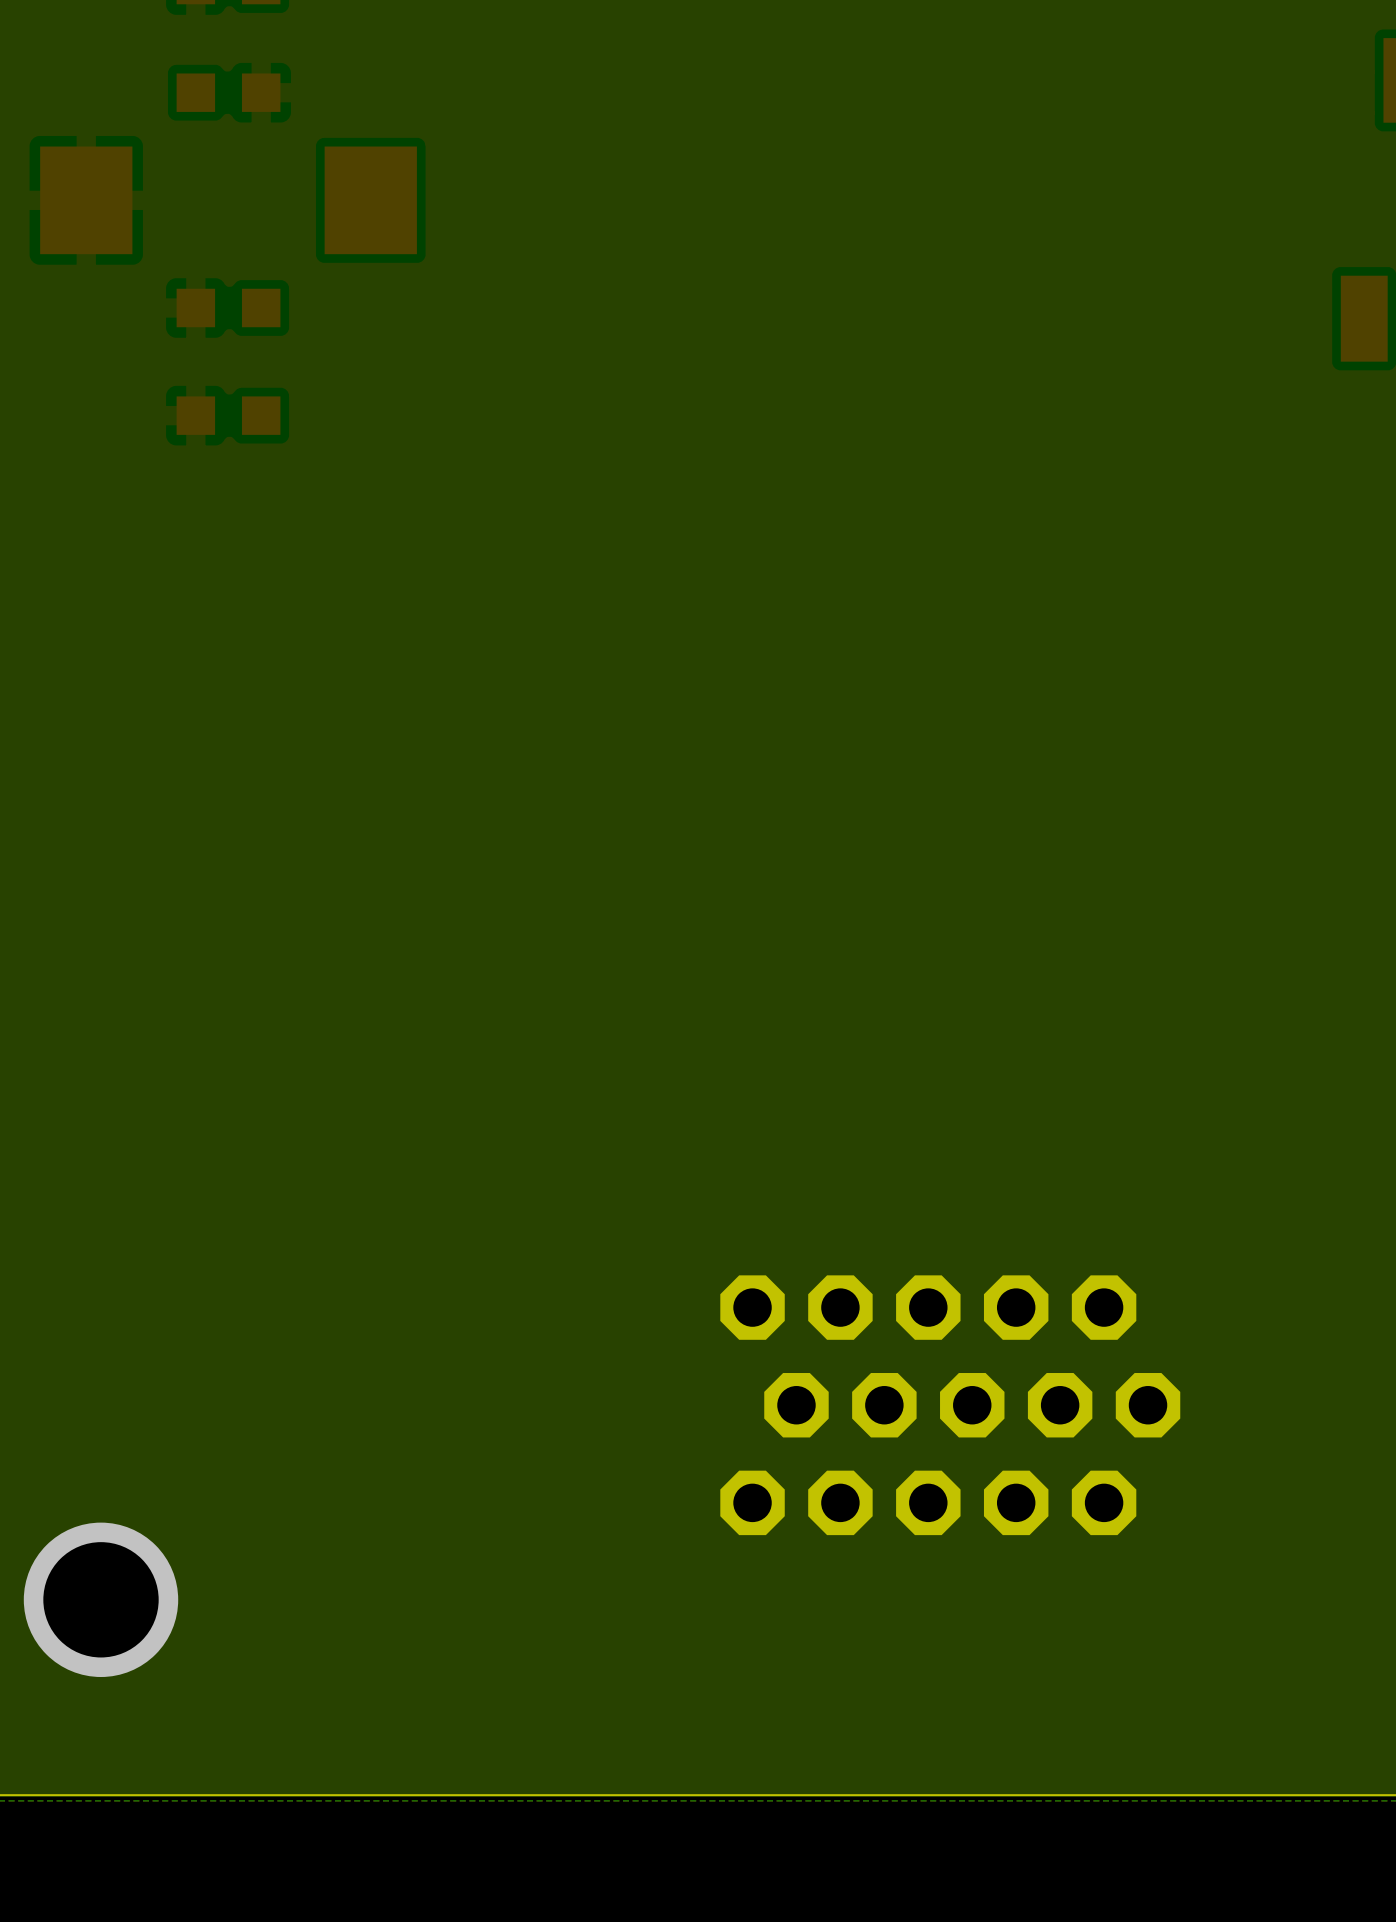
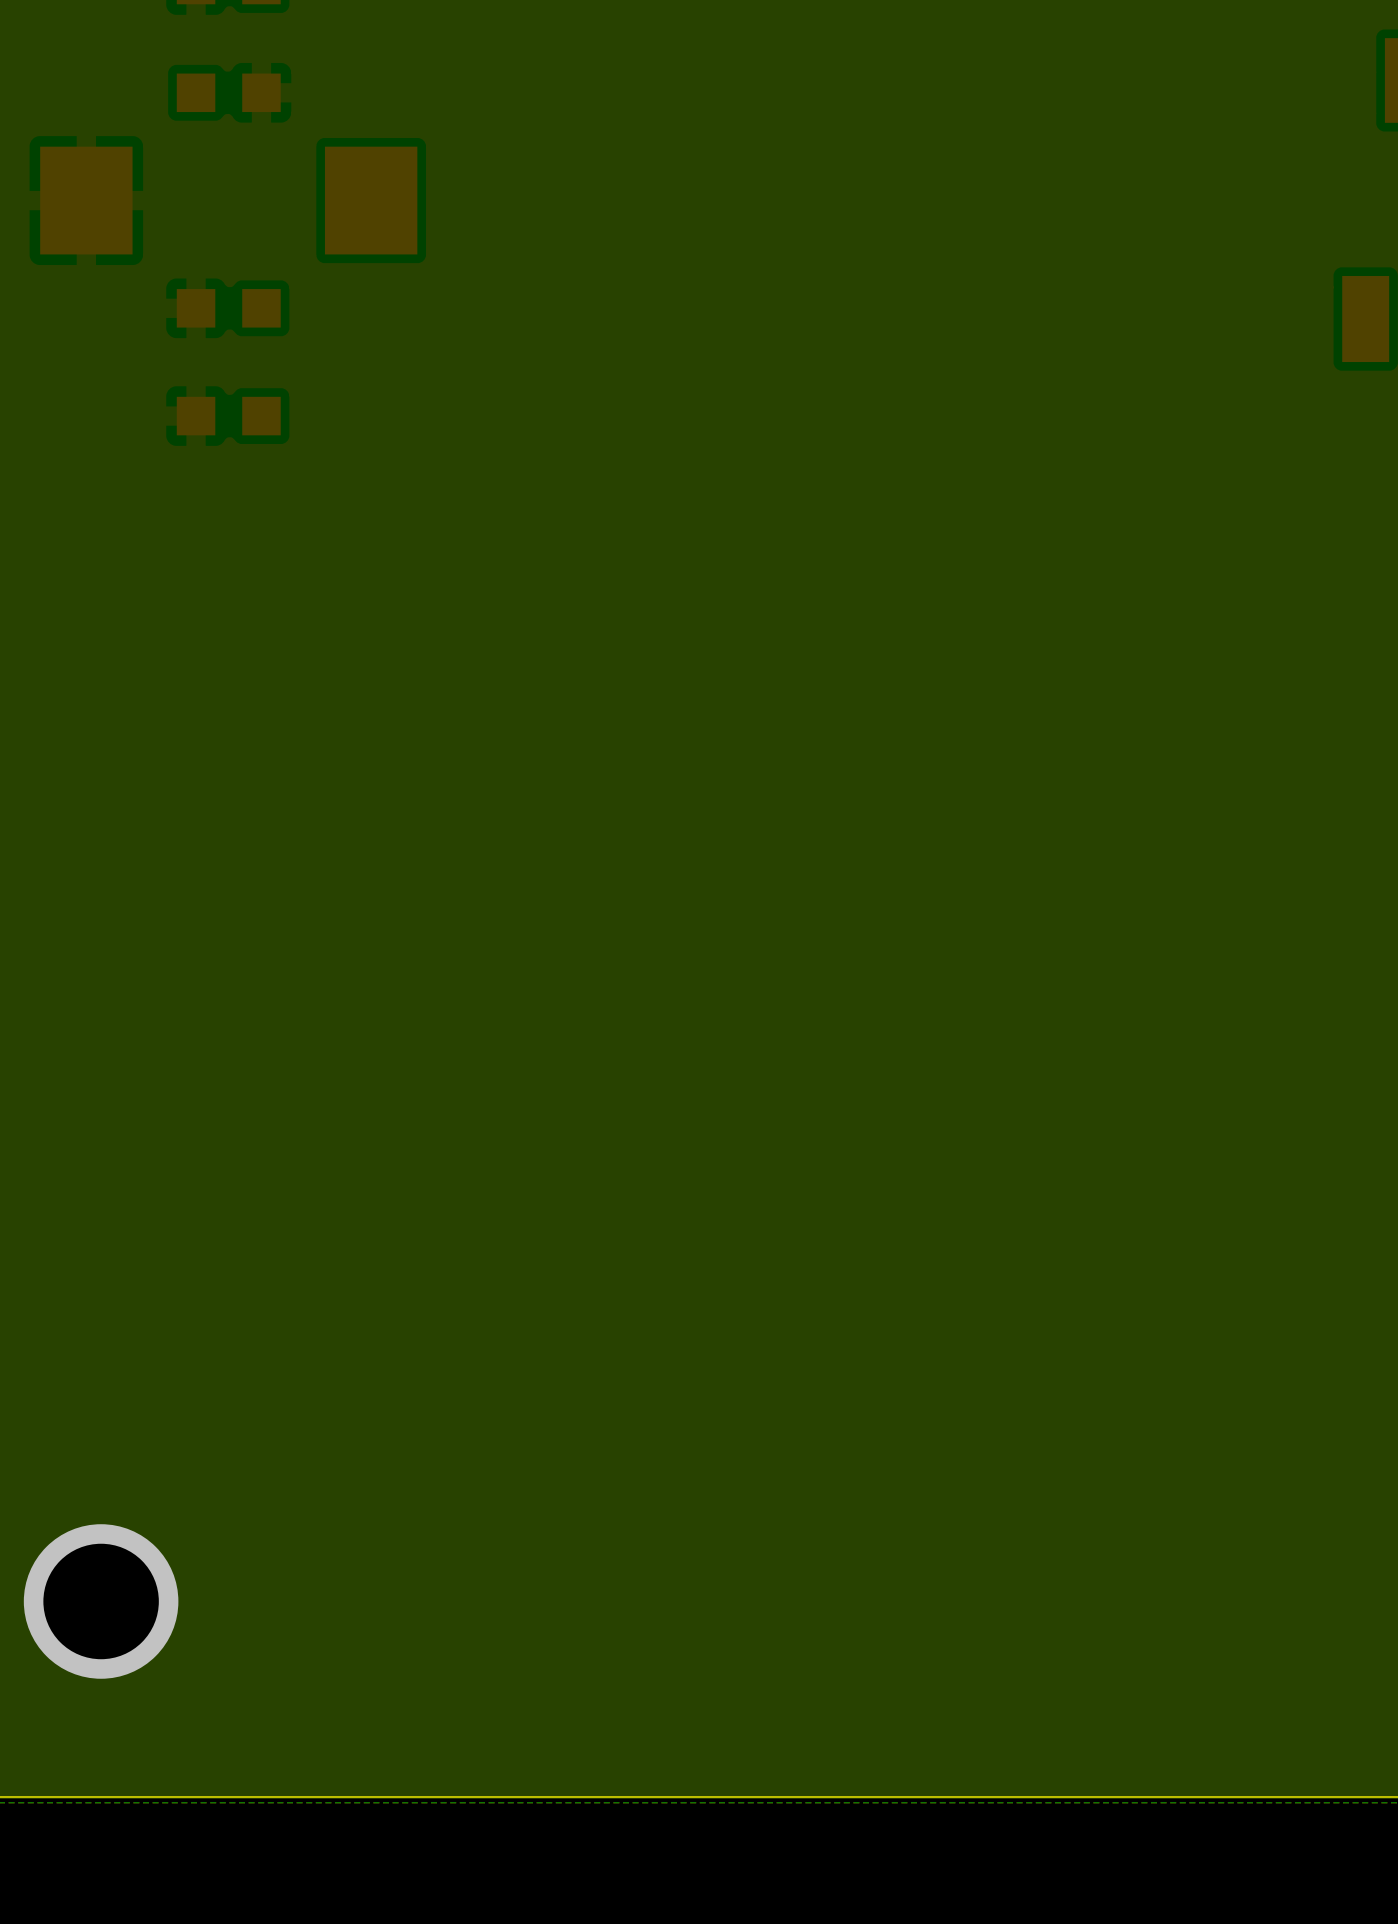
part: (950, 1405) -> none

